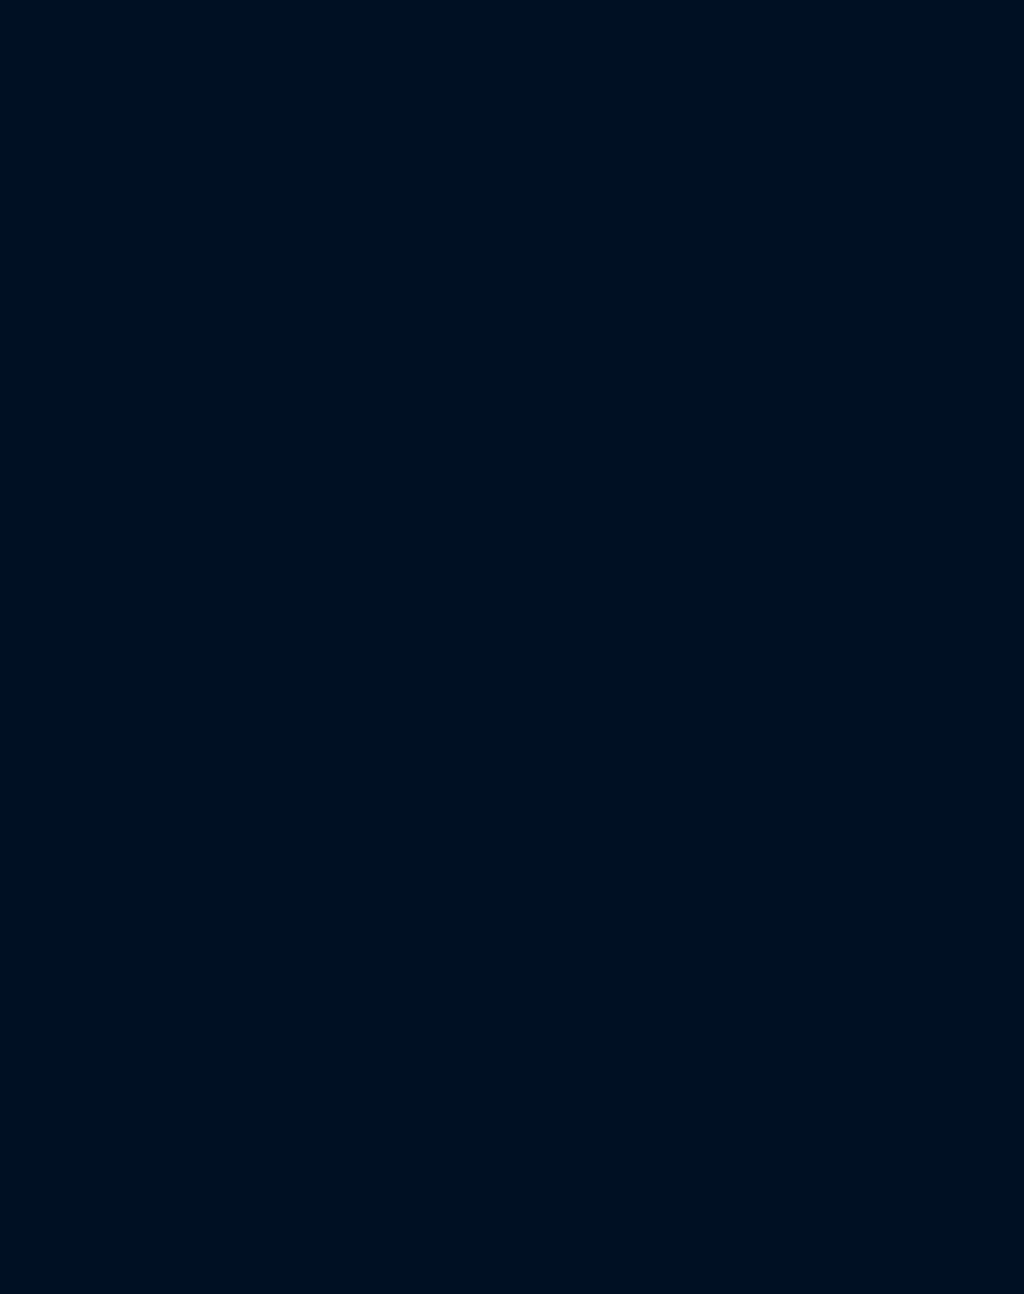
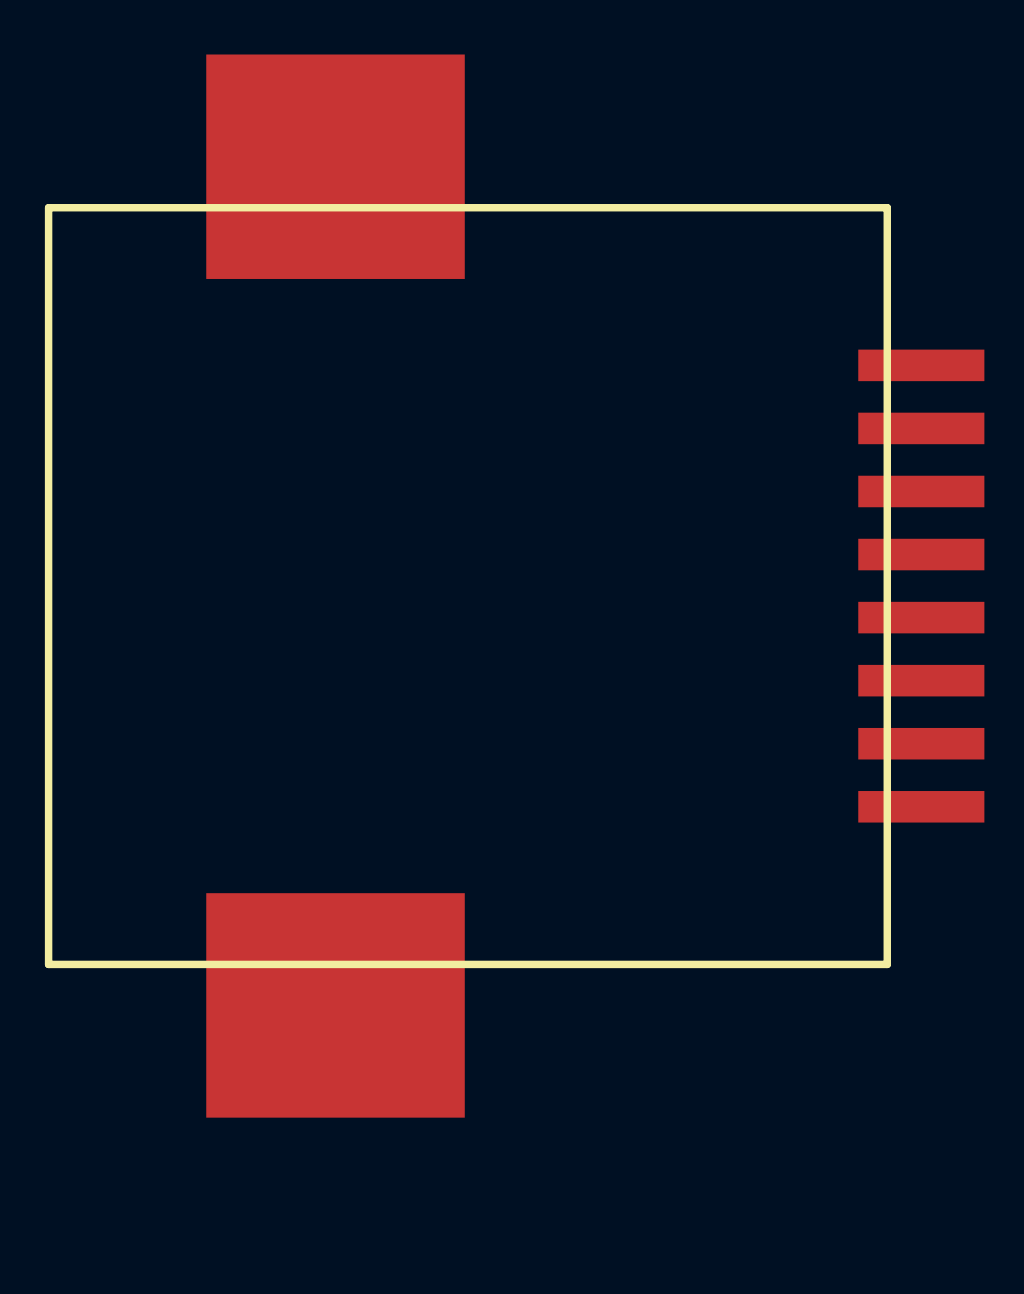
part: none -> (514, 586)

